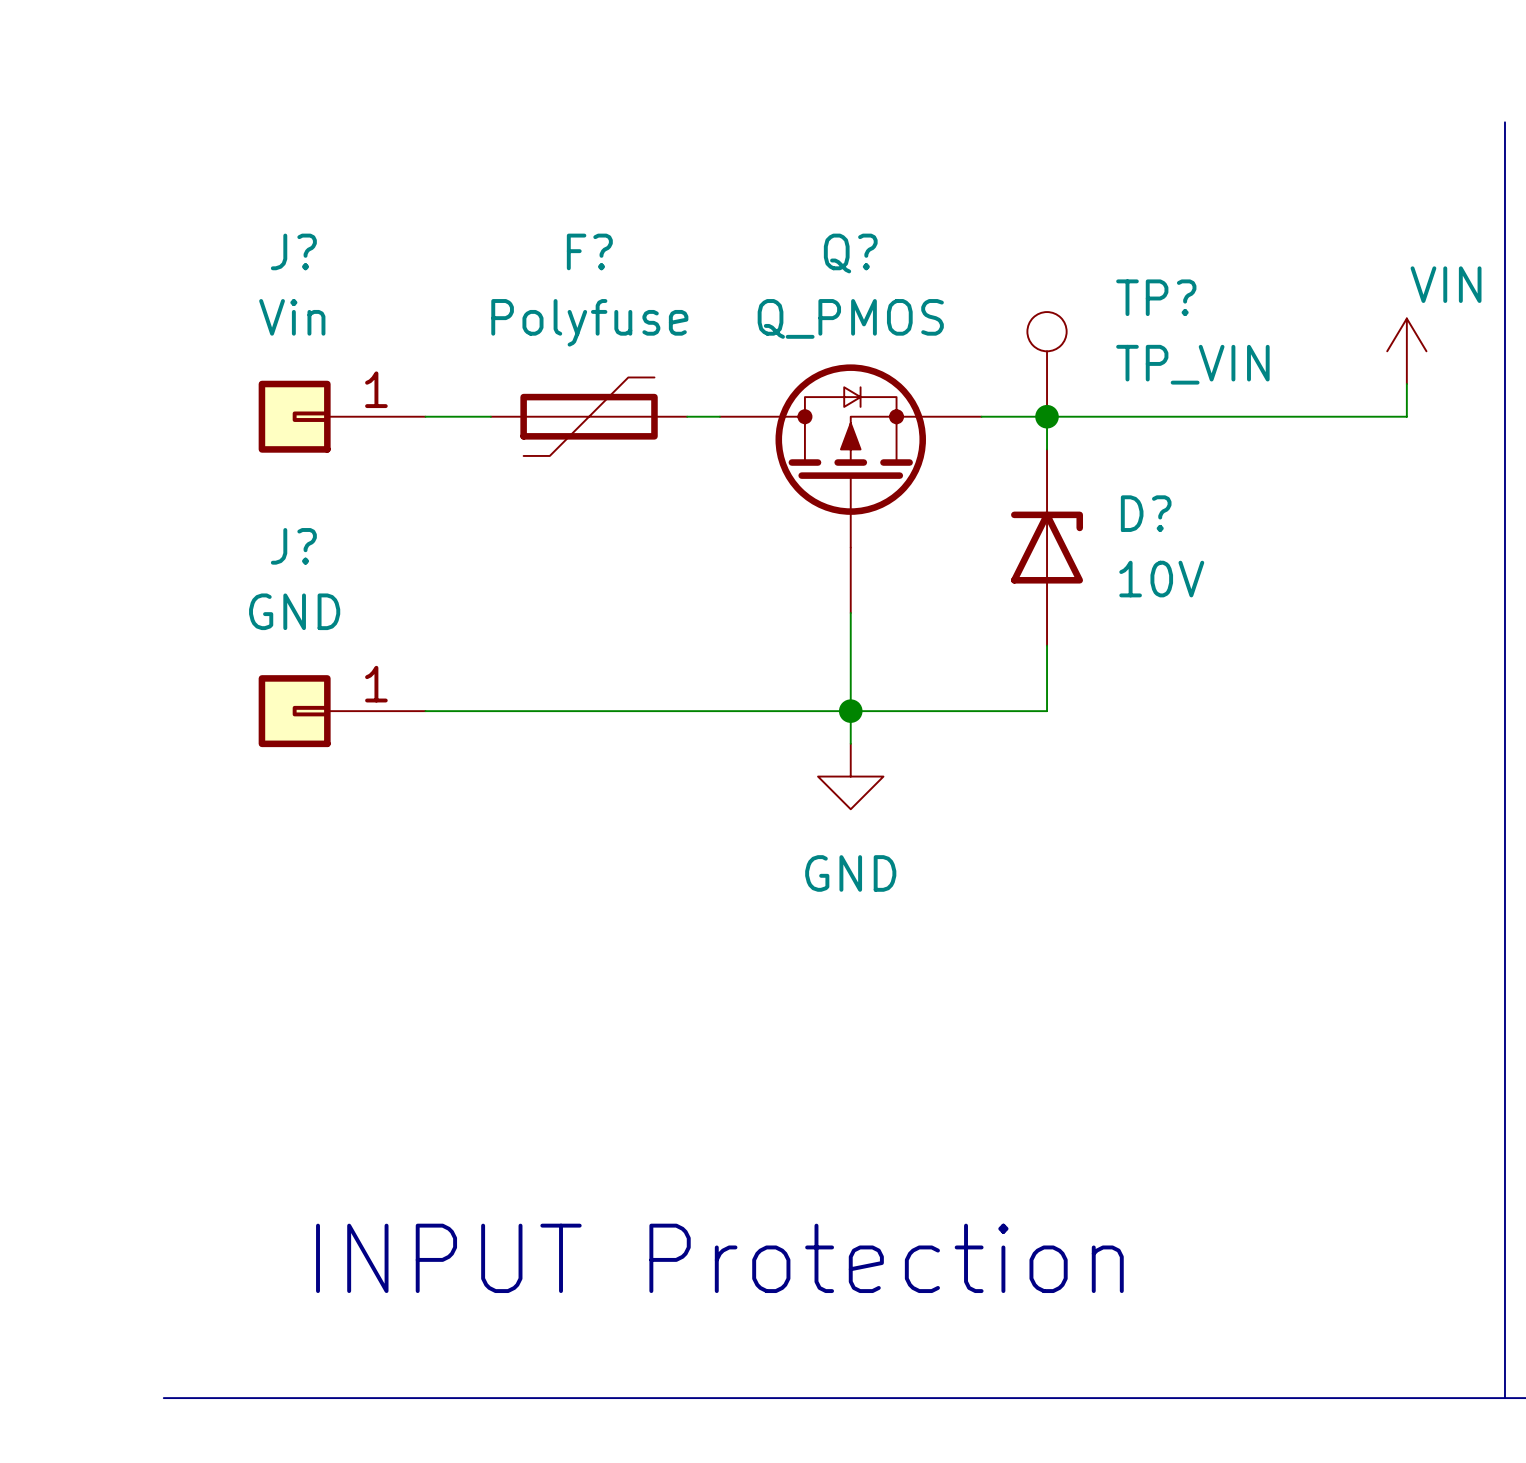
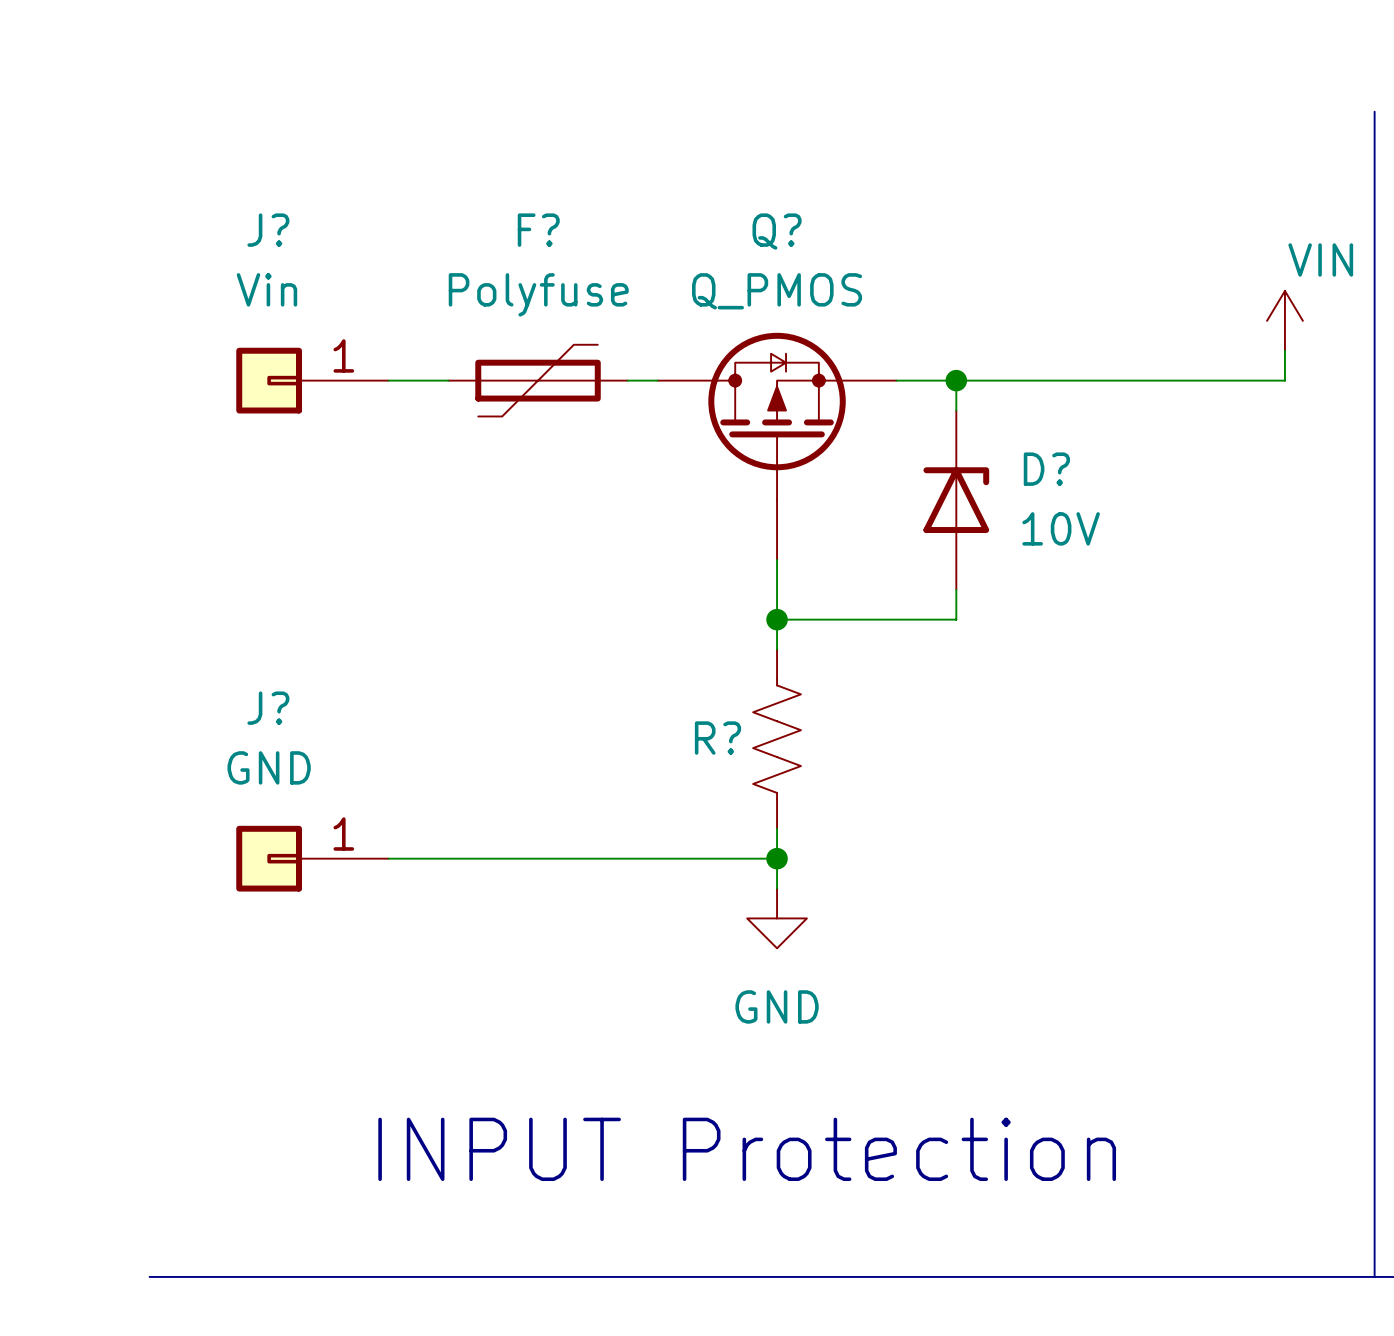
TP?: TP_VIN (1047, 364) -> none
wire: (1047, 678) (1047, 711) (425, 711) -> (956, 619) (777, 619)
J? position: (342, 711) -> (312, 858)
junction position: (850, 711) -> (777, 619)
power symbol position: GND (850, 776) -> GND (777, 918)
R?: none -> (777, 739)
wire: none -> (777, 828) (777, 888)
wire: none -> (388, 858) (777, 858)
junction: none -> (777, 858)
text position: INPUT Protection (719, 1258) -> INPUT Protection (747, 1149)

